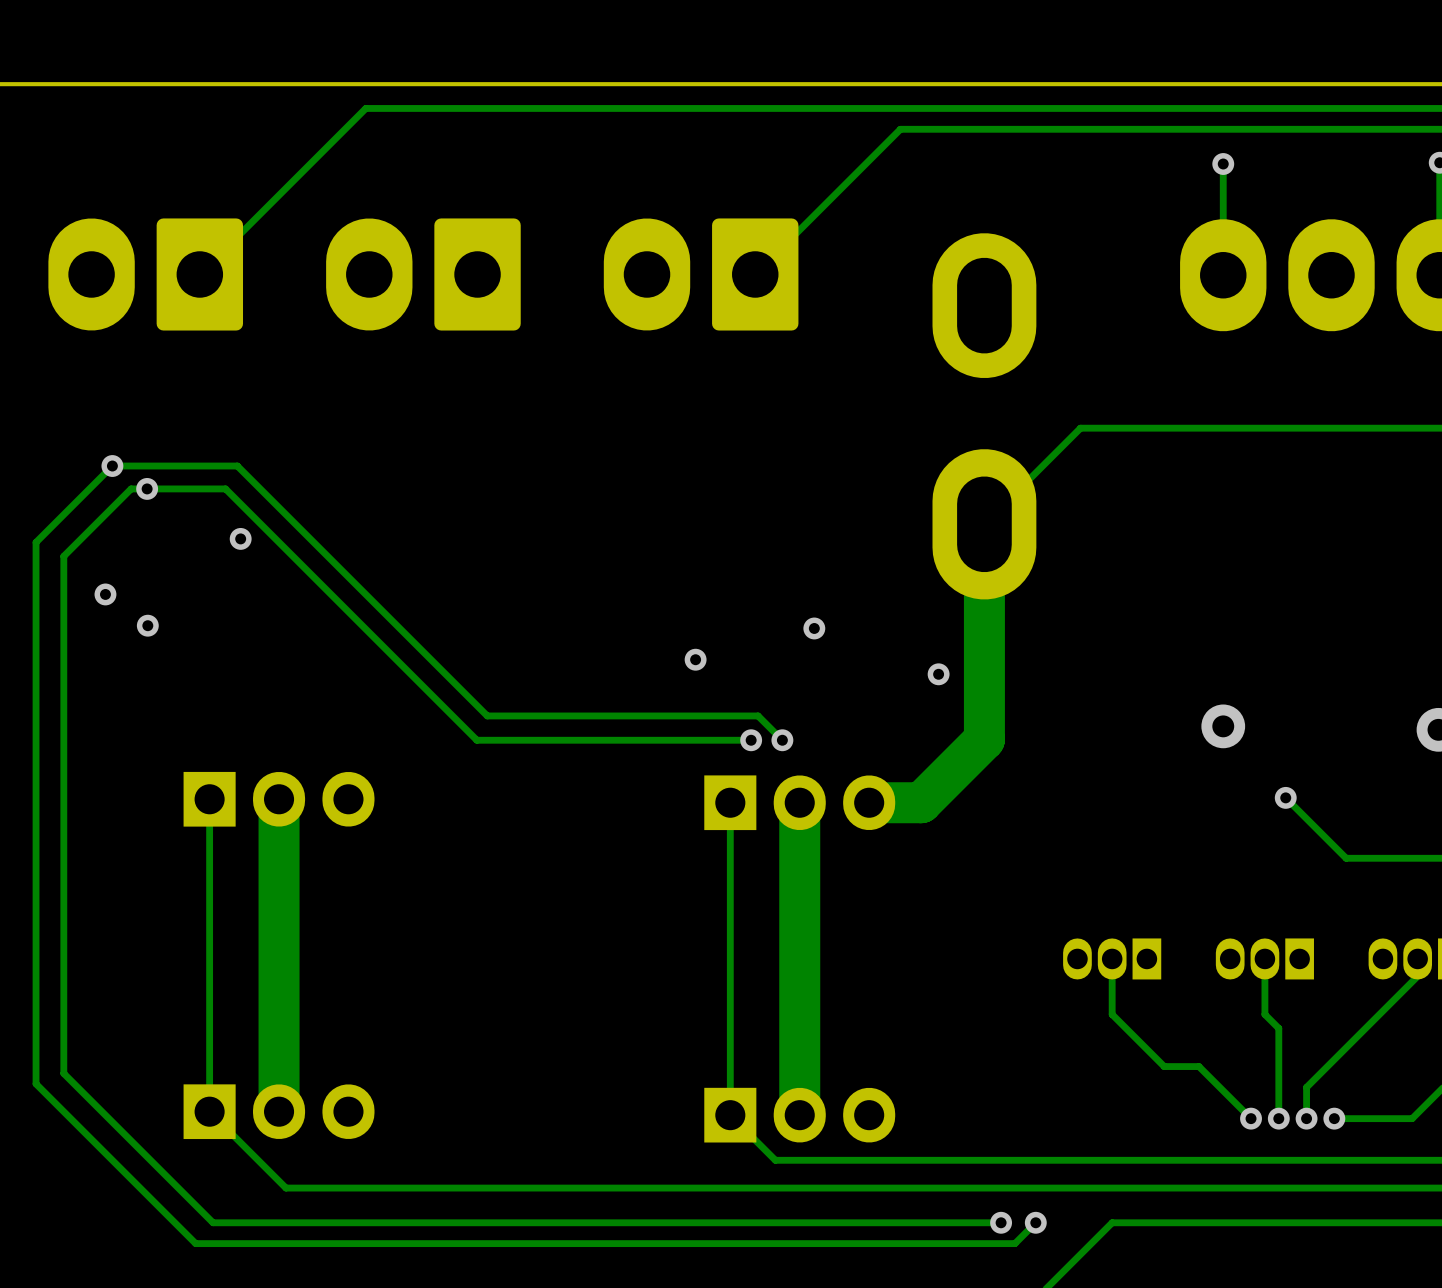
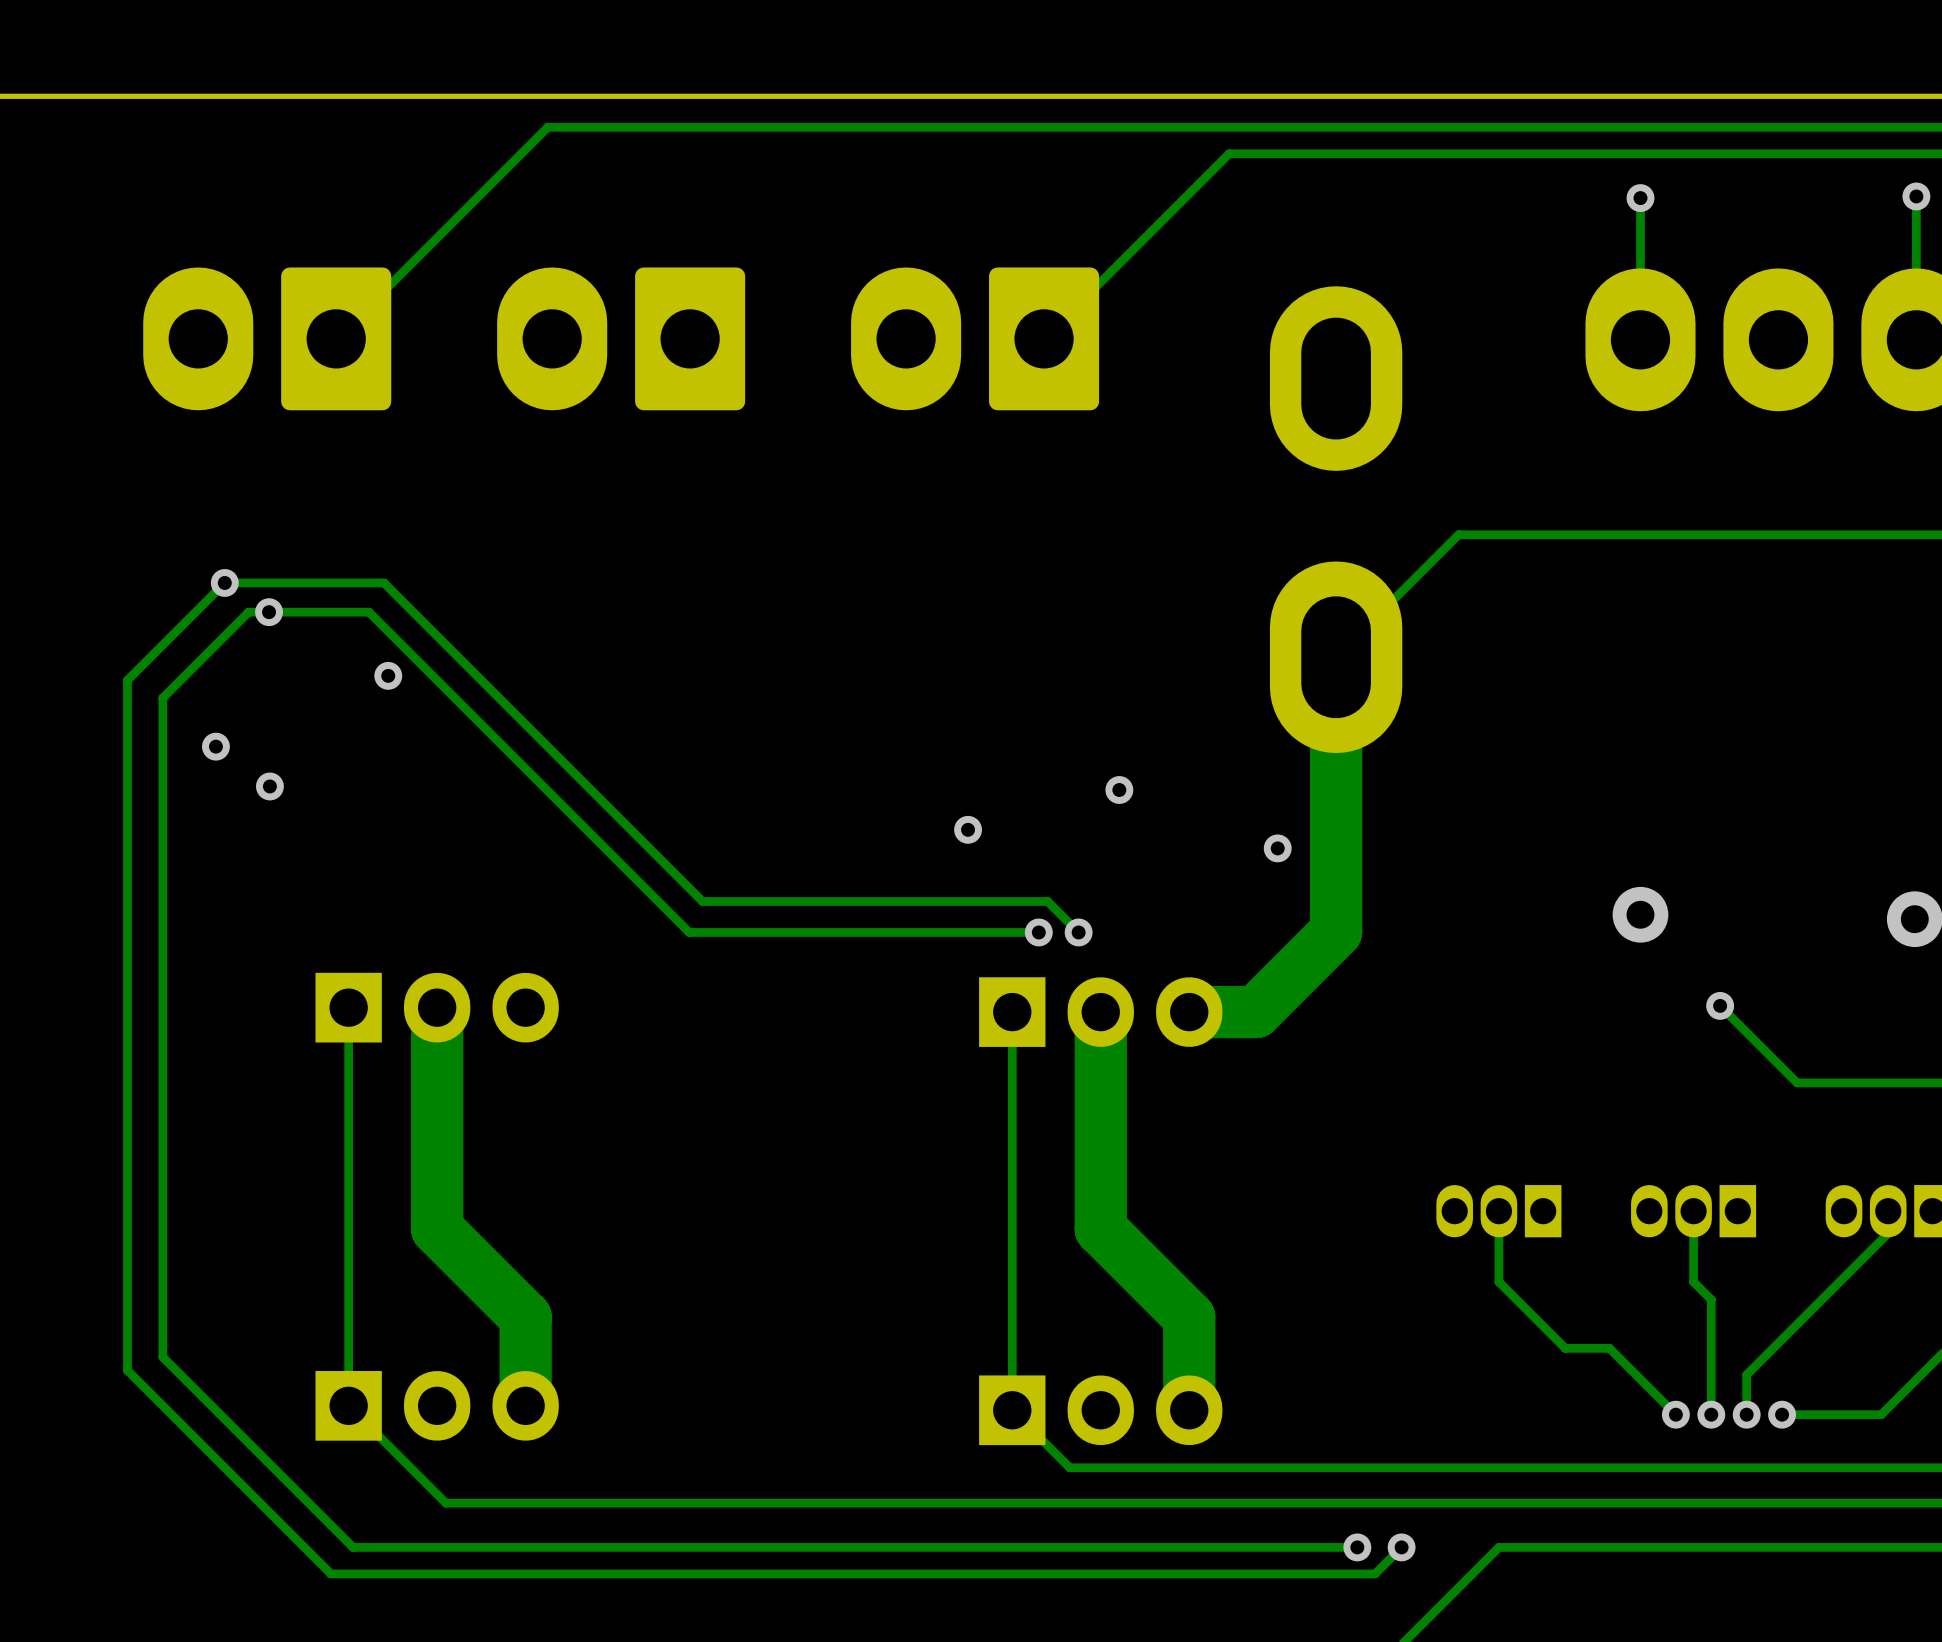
track: (279, 972) (279, 1111) -> (437, 1228) (525, 1317) (525, 1405)
track: (799, 972) (799, 1115) -> (1100, 1228) (1189, 1317) (1189, 1405)

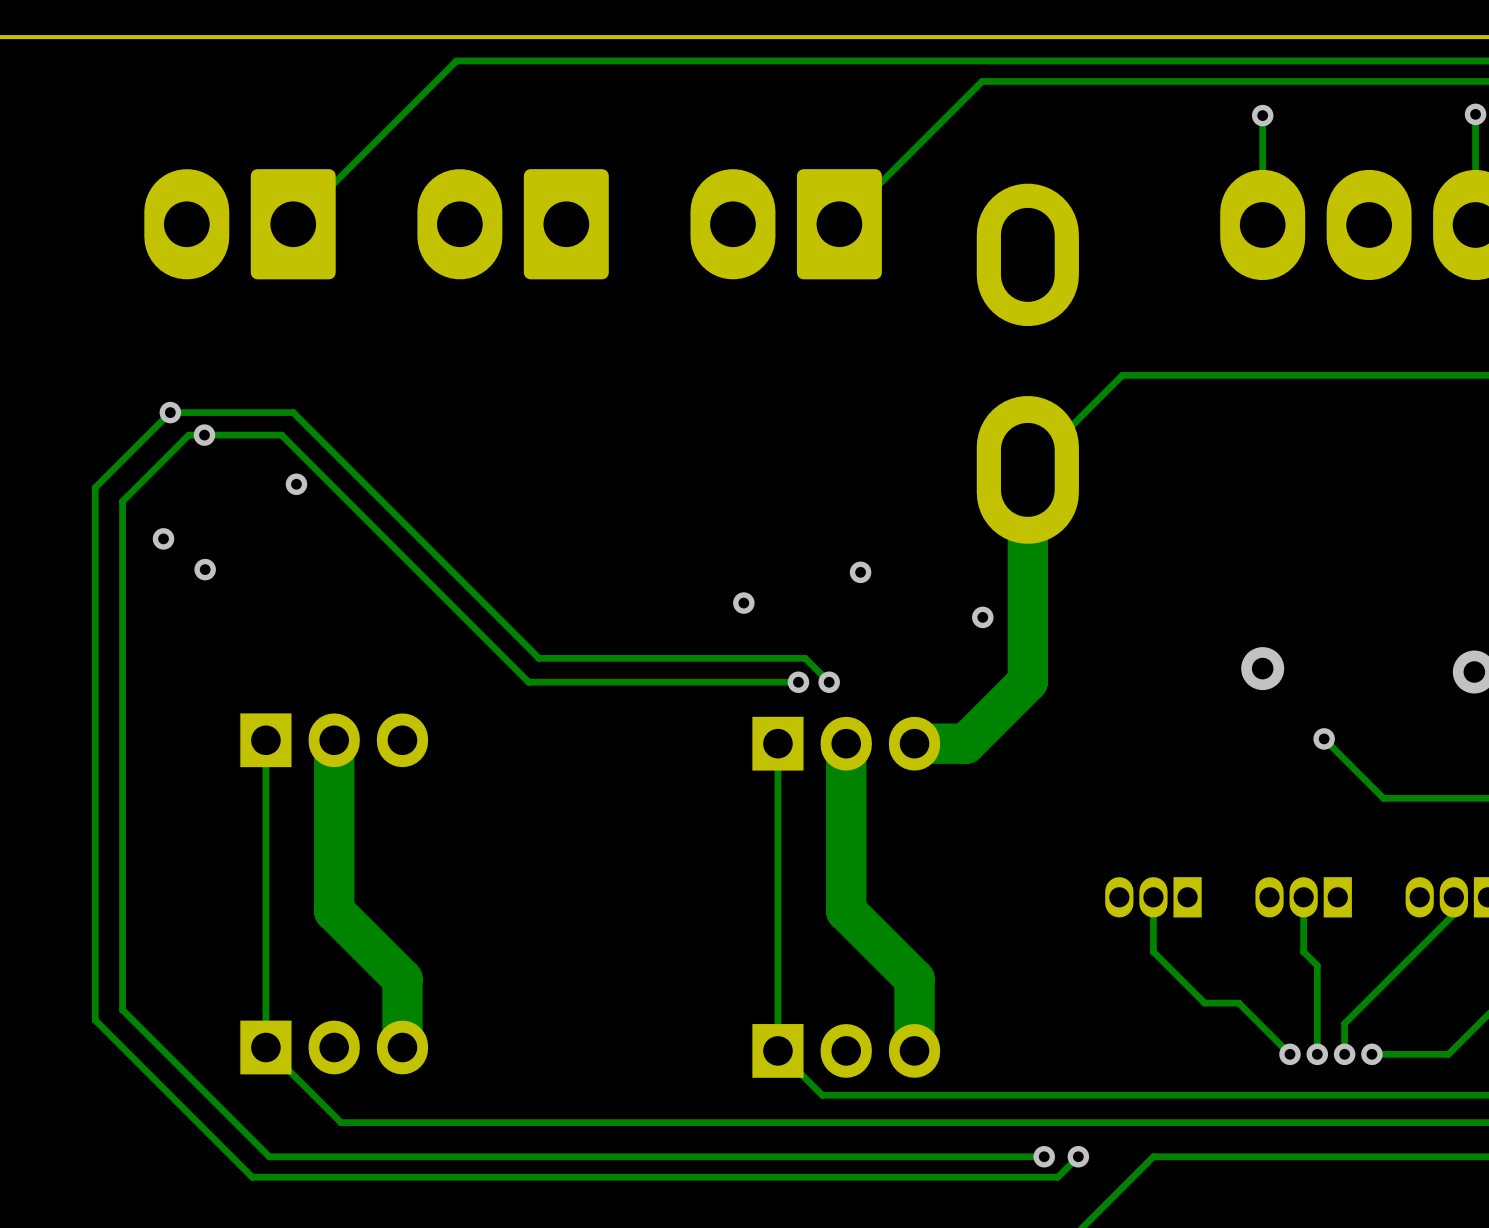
track: (595, 127) (547, 127) (336, 338) -> (456, 60) (293, 224)
track: (1276, 153) (1229, 153) (1044, 338) -> (982, 81) (839, 224)
part position: (267, 338) -> (240, 224)
part position: (621, 338) -> (513, 224)
part position: (975, 338) -> (786, 224)

